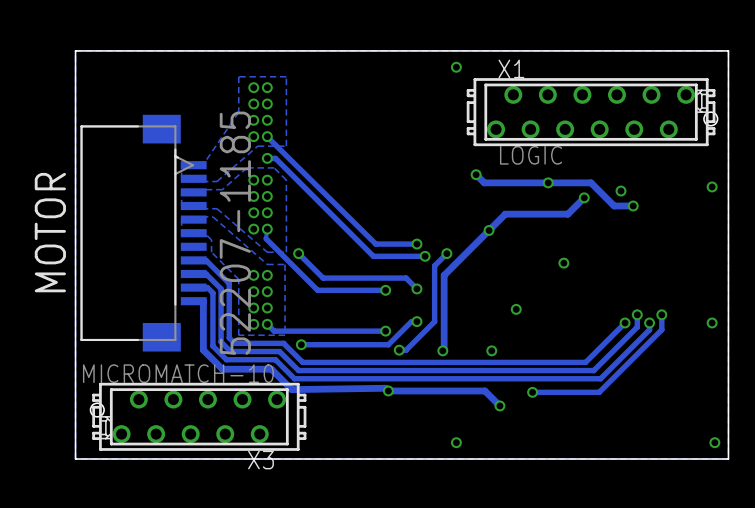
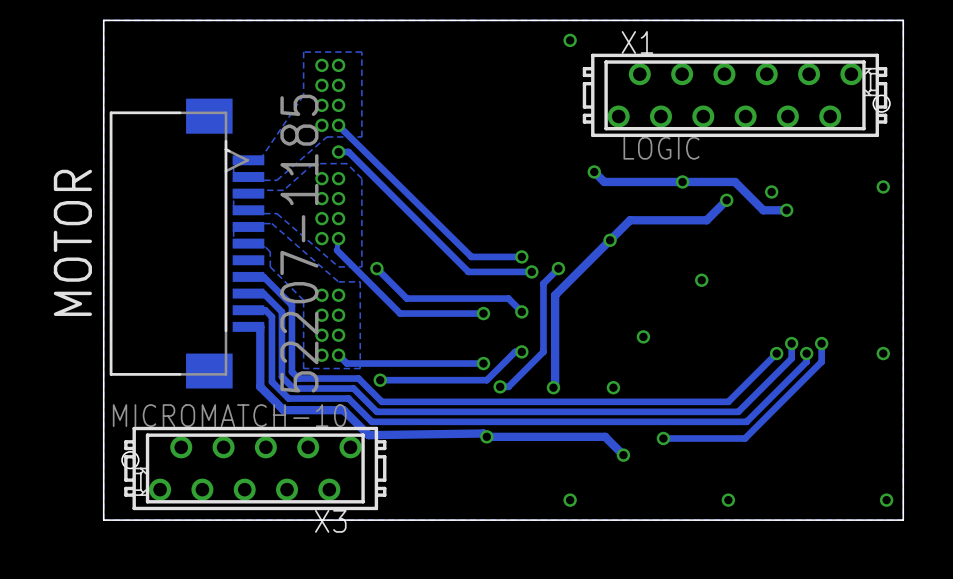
via: none -> (728, 500)

